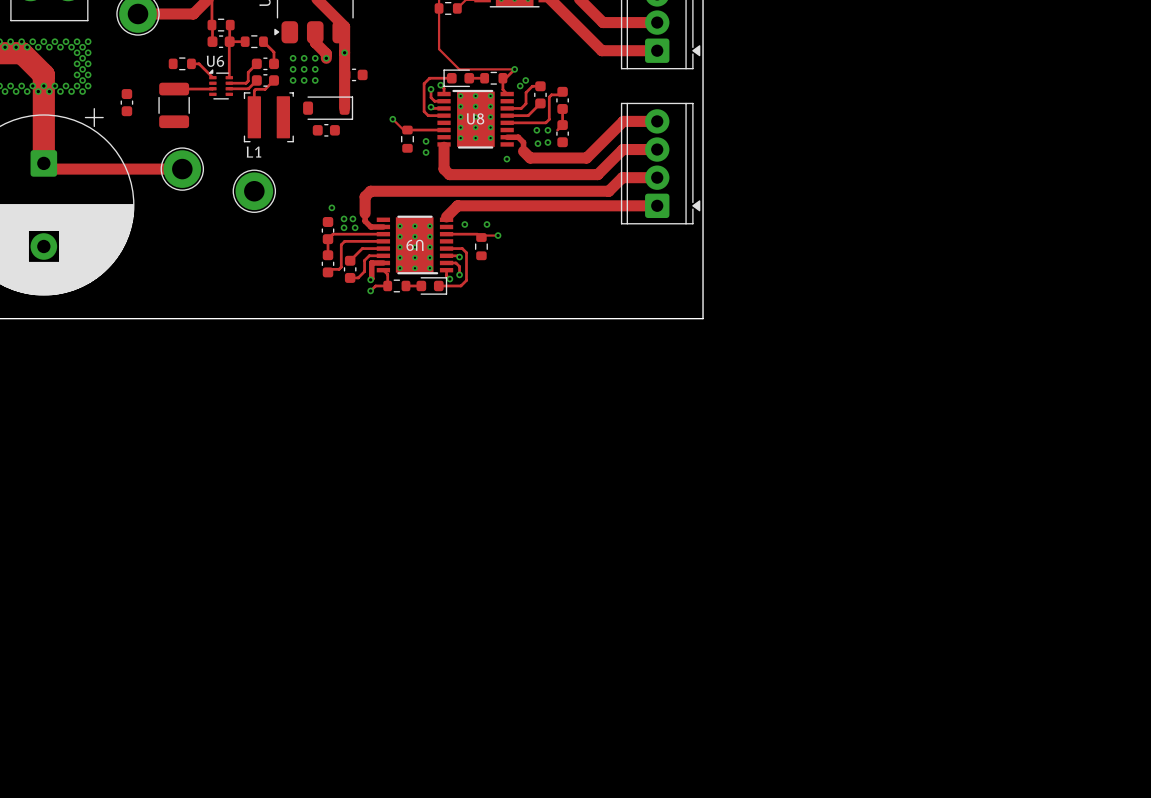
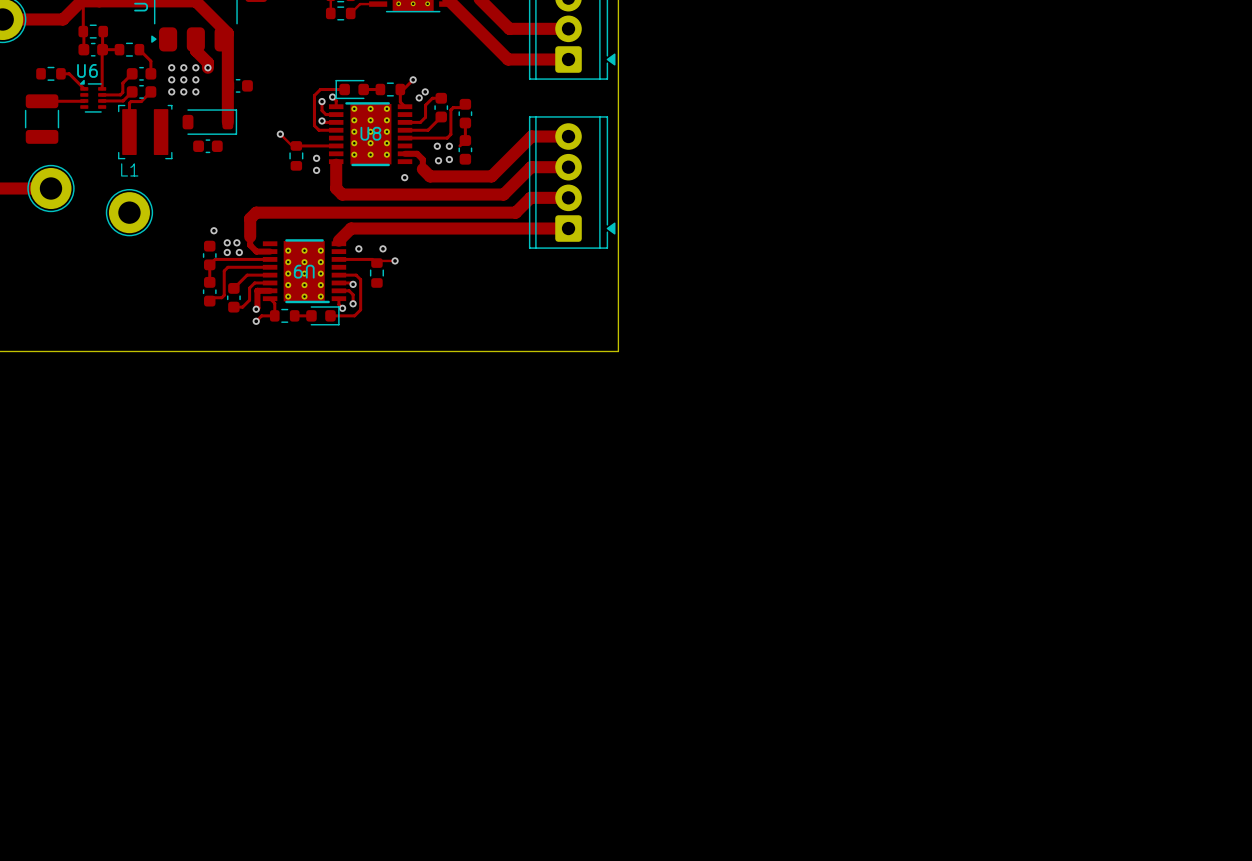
track: (439, 8) (439, 49) (459, 69) (514, 69) -> none
via: (344, 52) -> none

